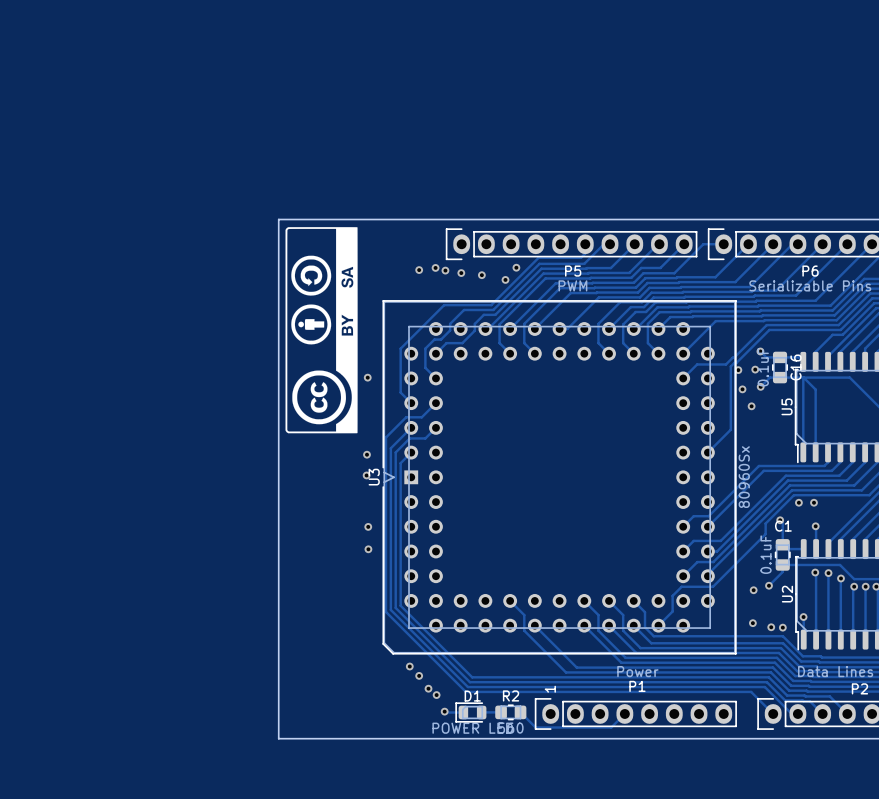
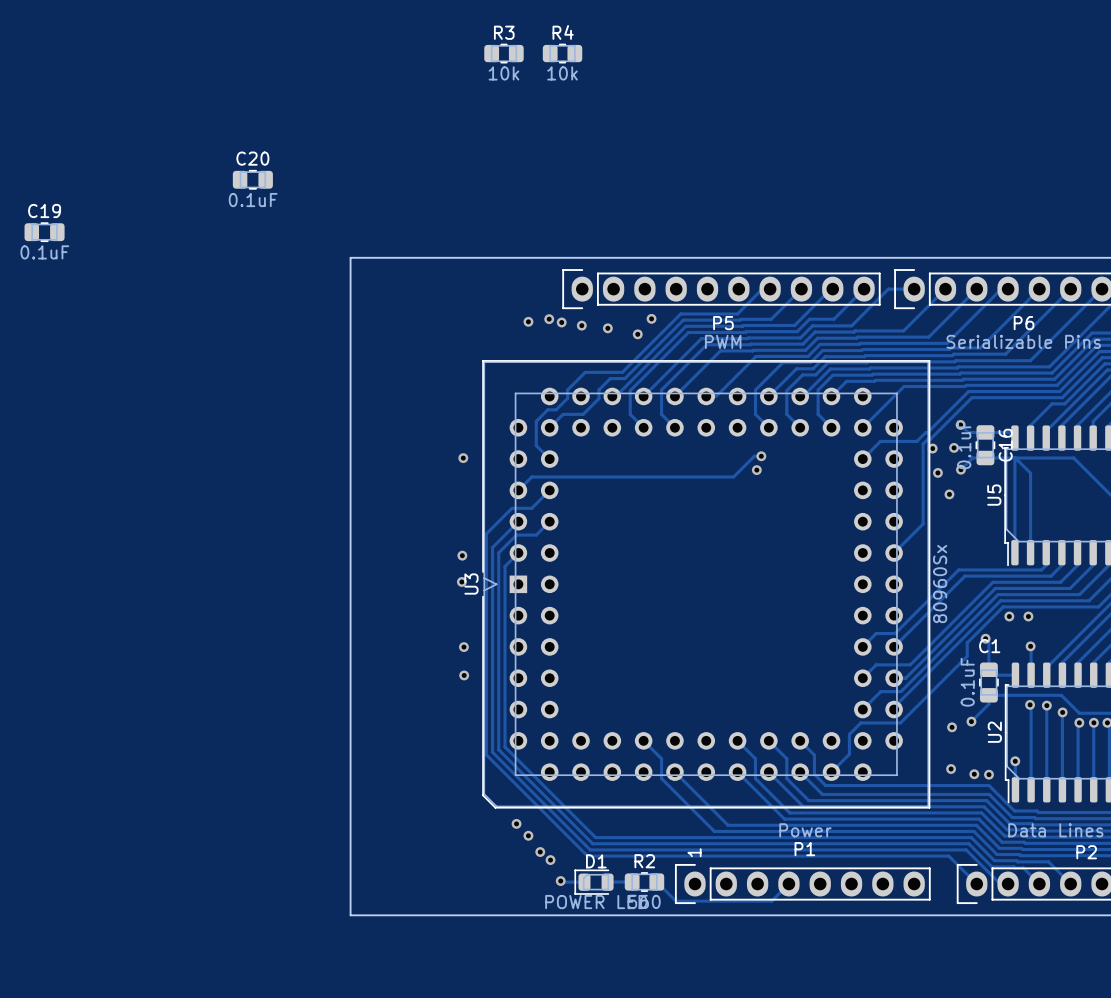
R3: none -> 10k (503, 53)
R4: none -> 10k (562, 53)
C20: none -> 0.1uF (252, 179)
C19: none -> 0.1uF (44, 232)
drawing: [285, 227, 358, 434] -> none
track: (585, 244) (585, 253) (581, 257) (538, 257) (491, 305) (444, 305) (400, 348) (400, 392) (411, 403) -> (761, 456) (754, 456) (733, 476) (531, 476) (518, 490)
via: none -> (761, 456)
via: none -> (756, 470)

